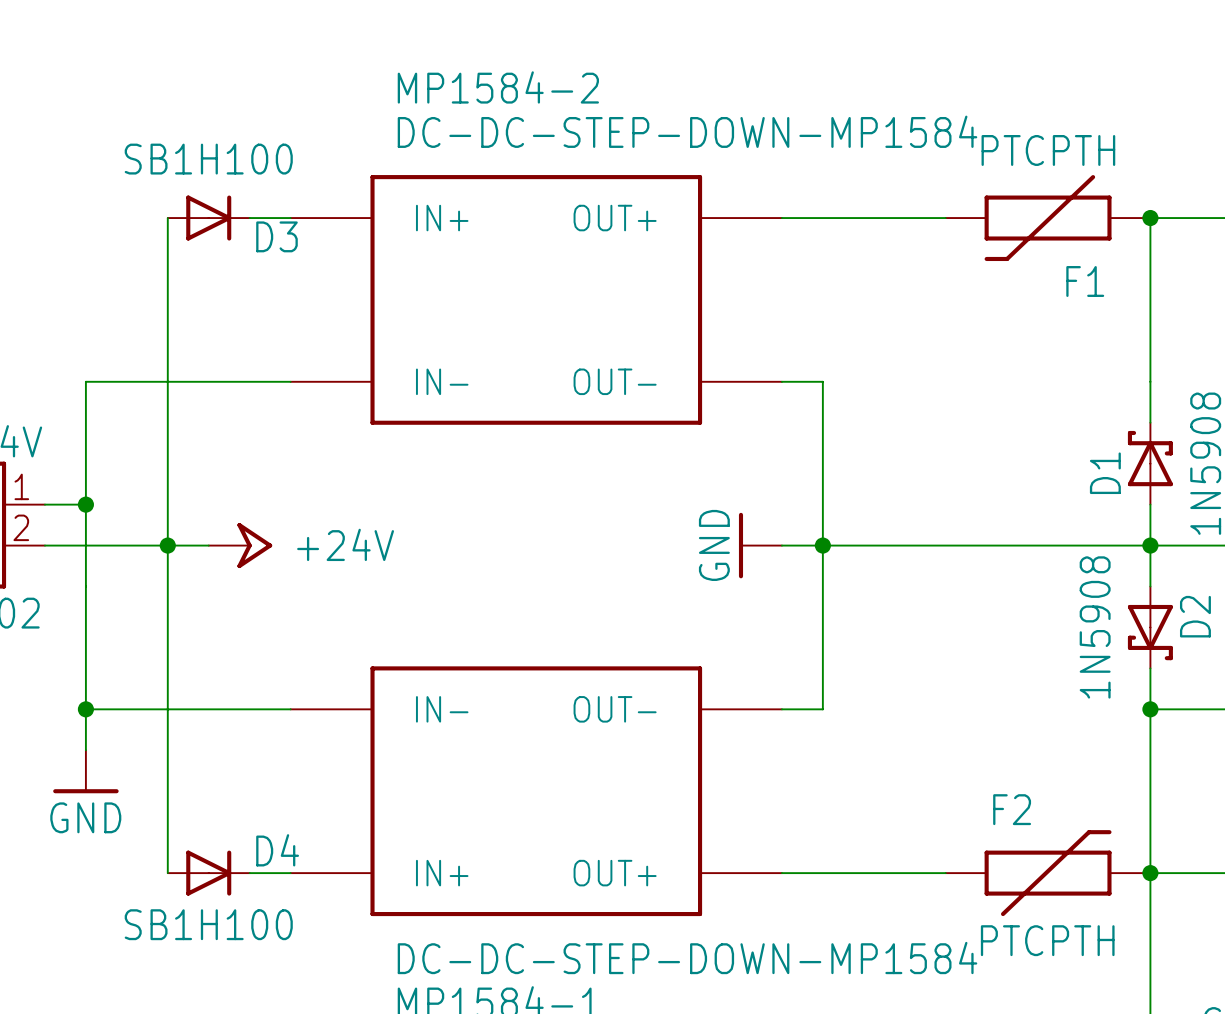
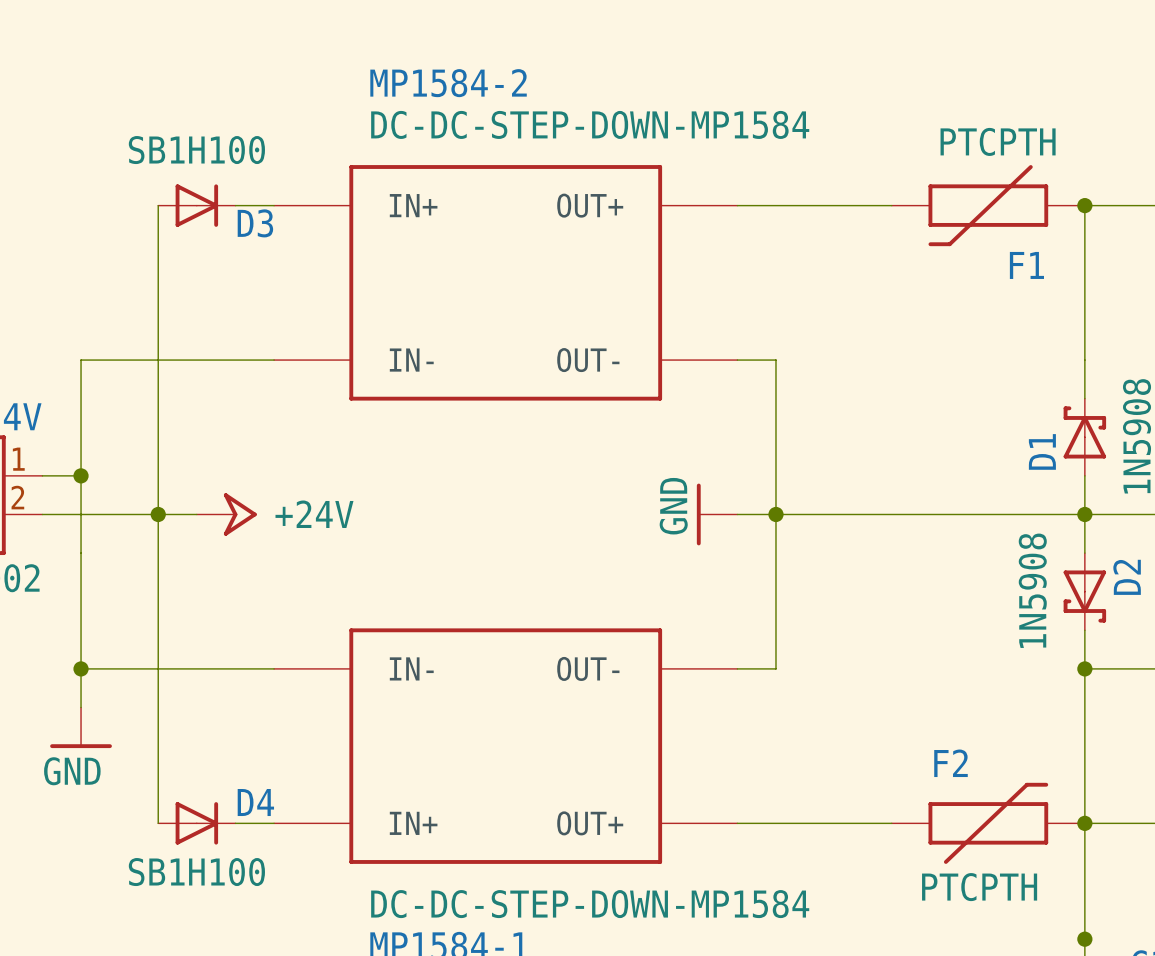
junction: none -> (1084, 939)

